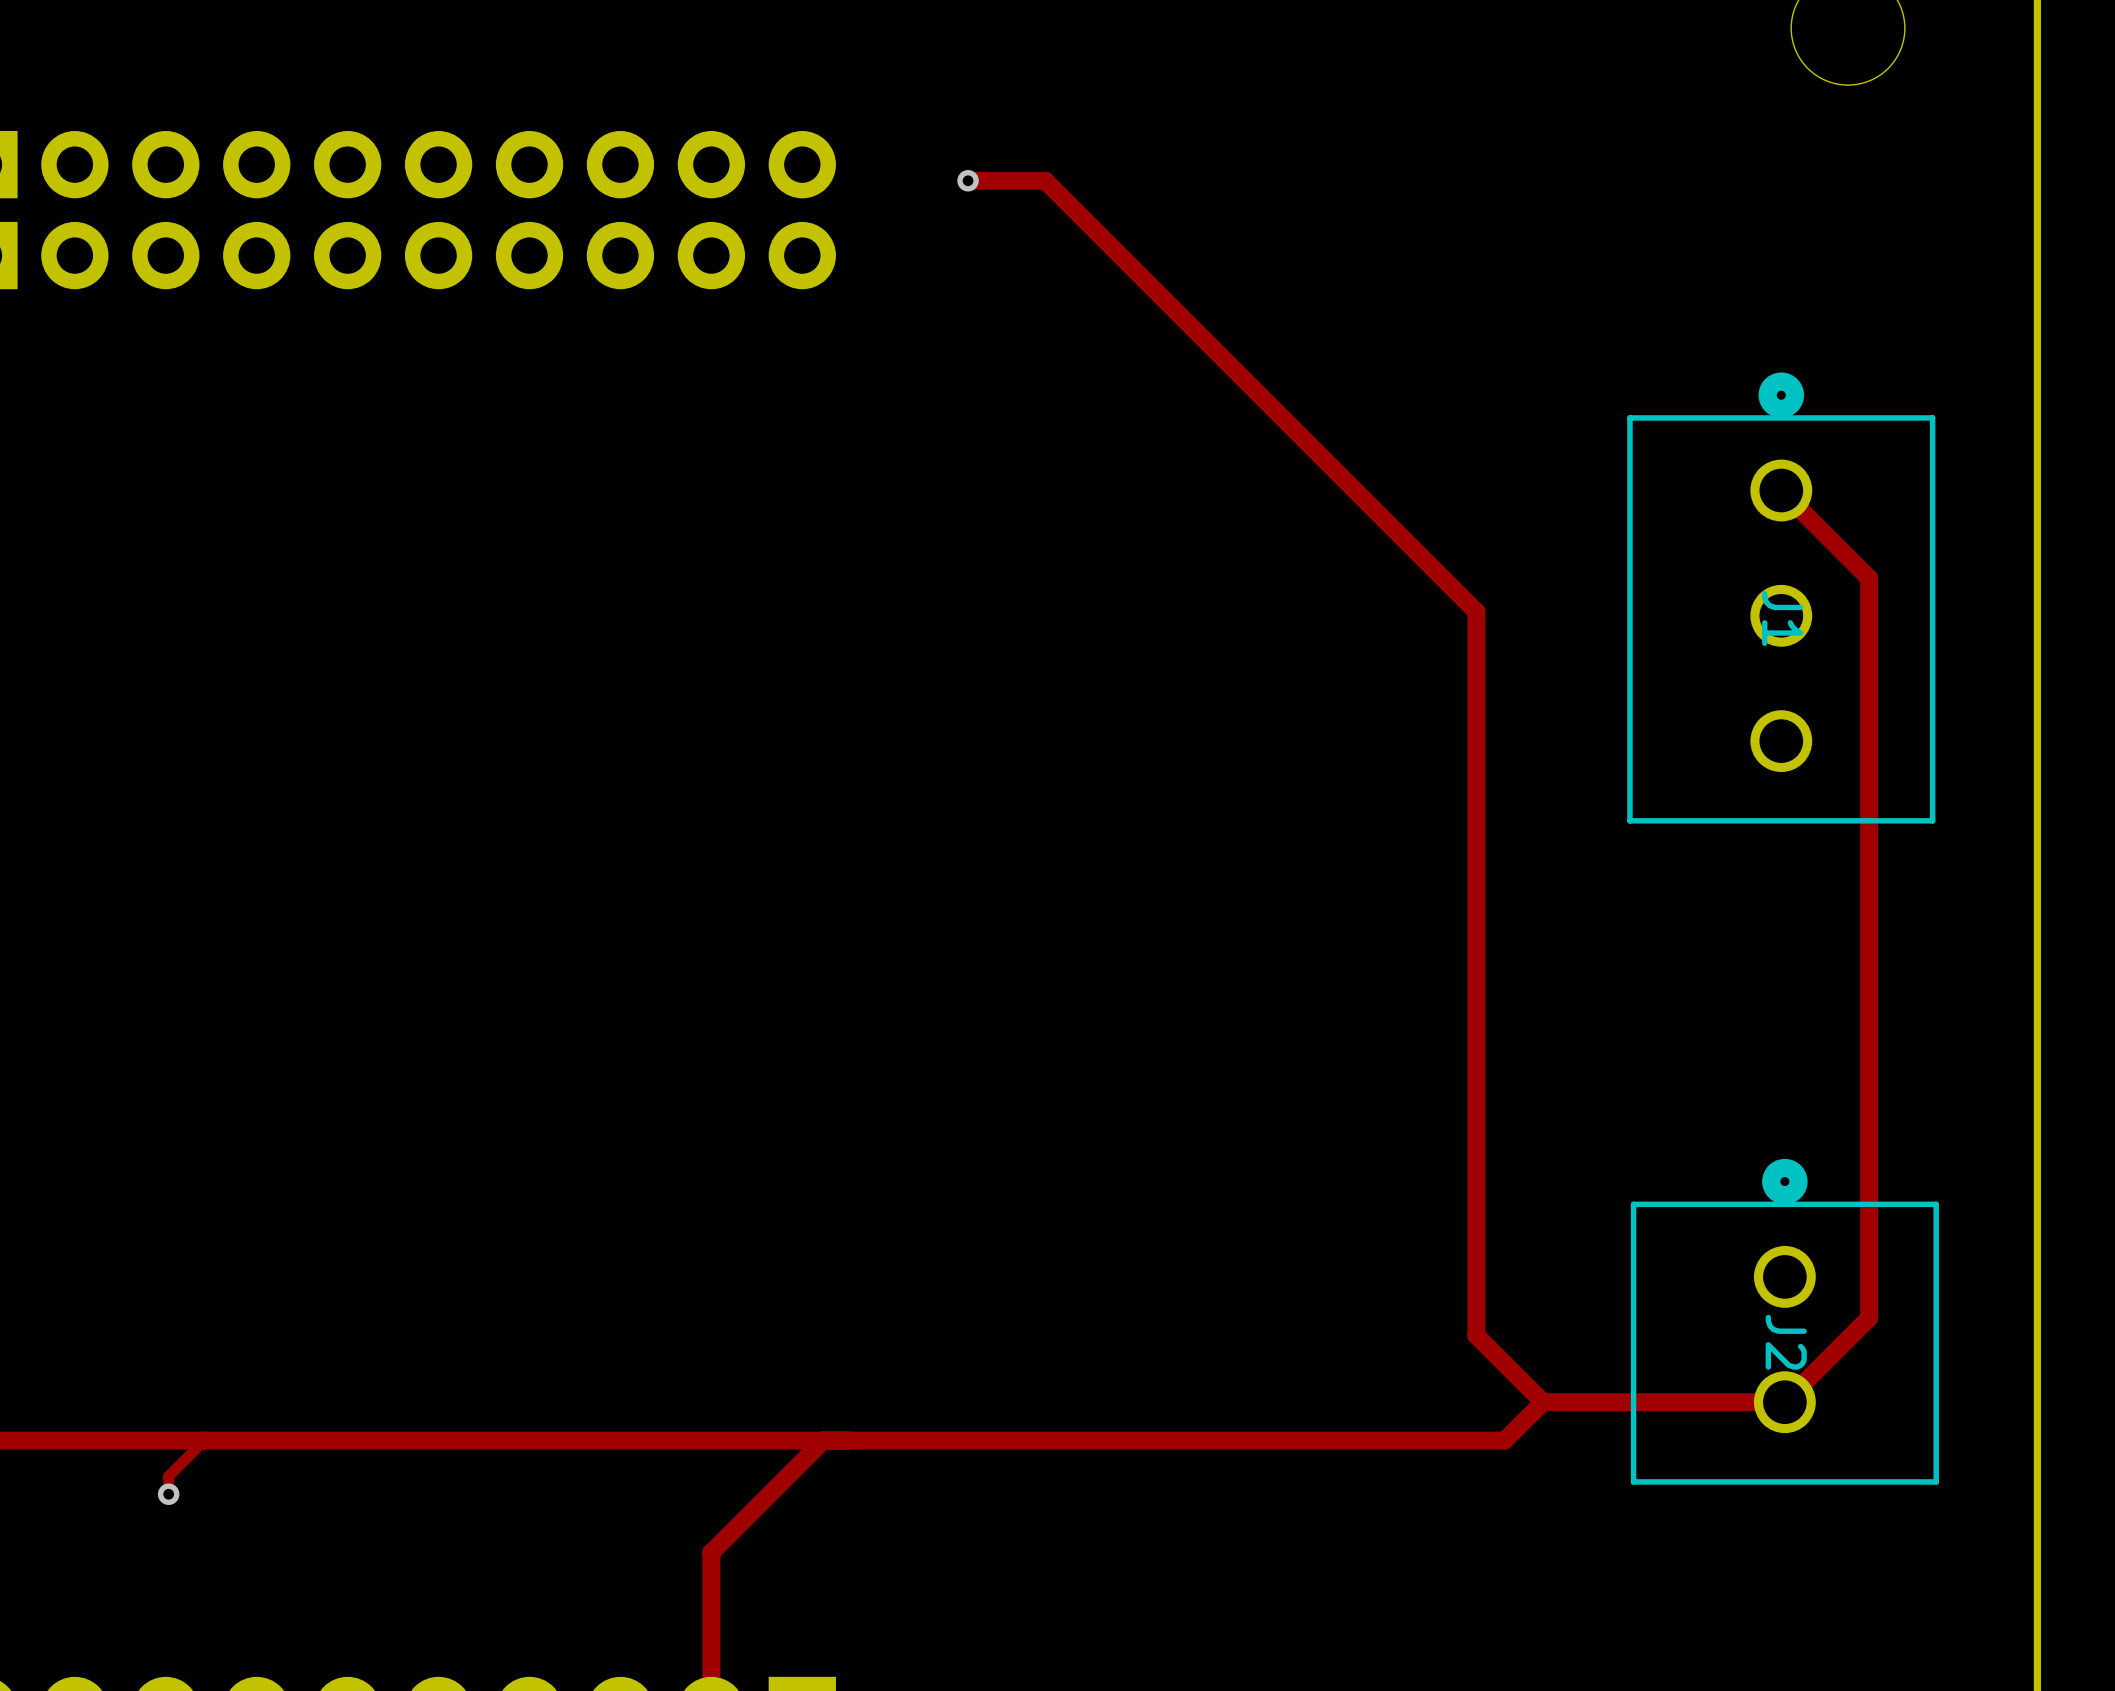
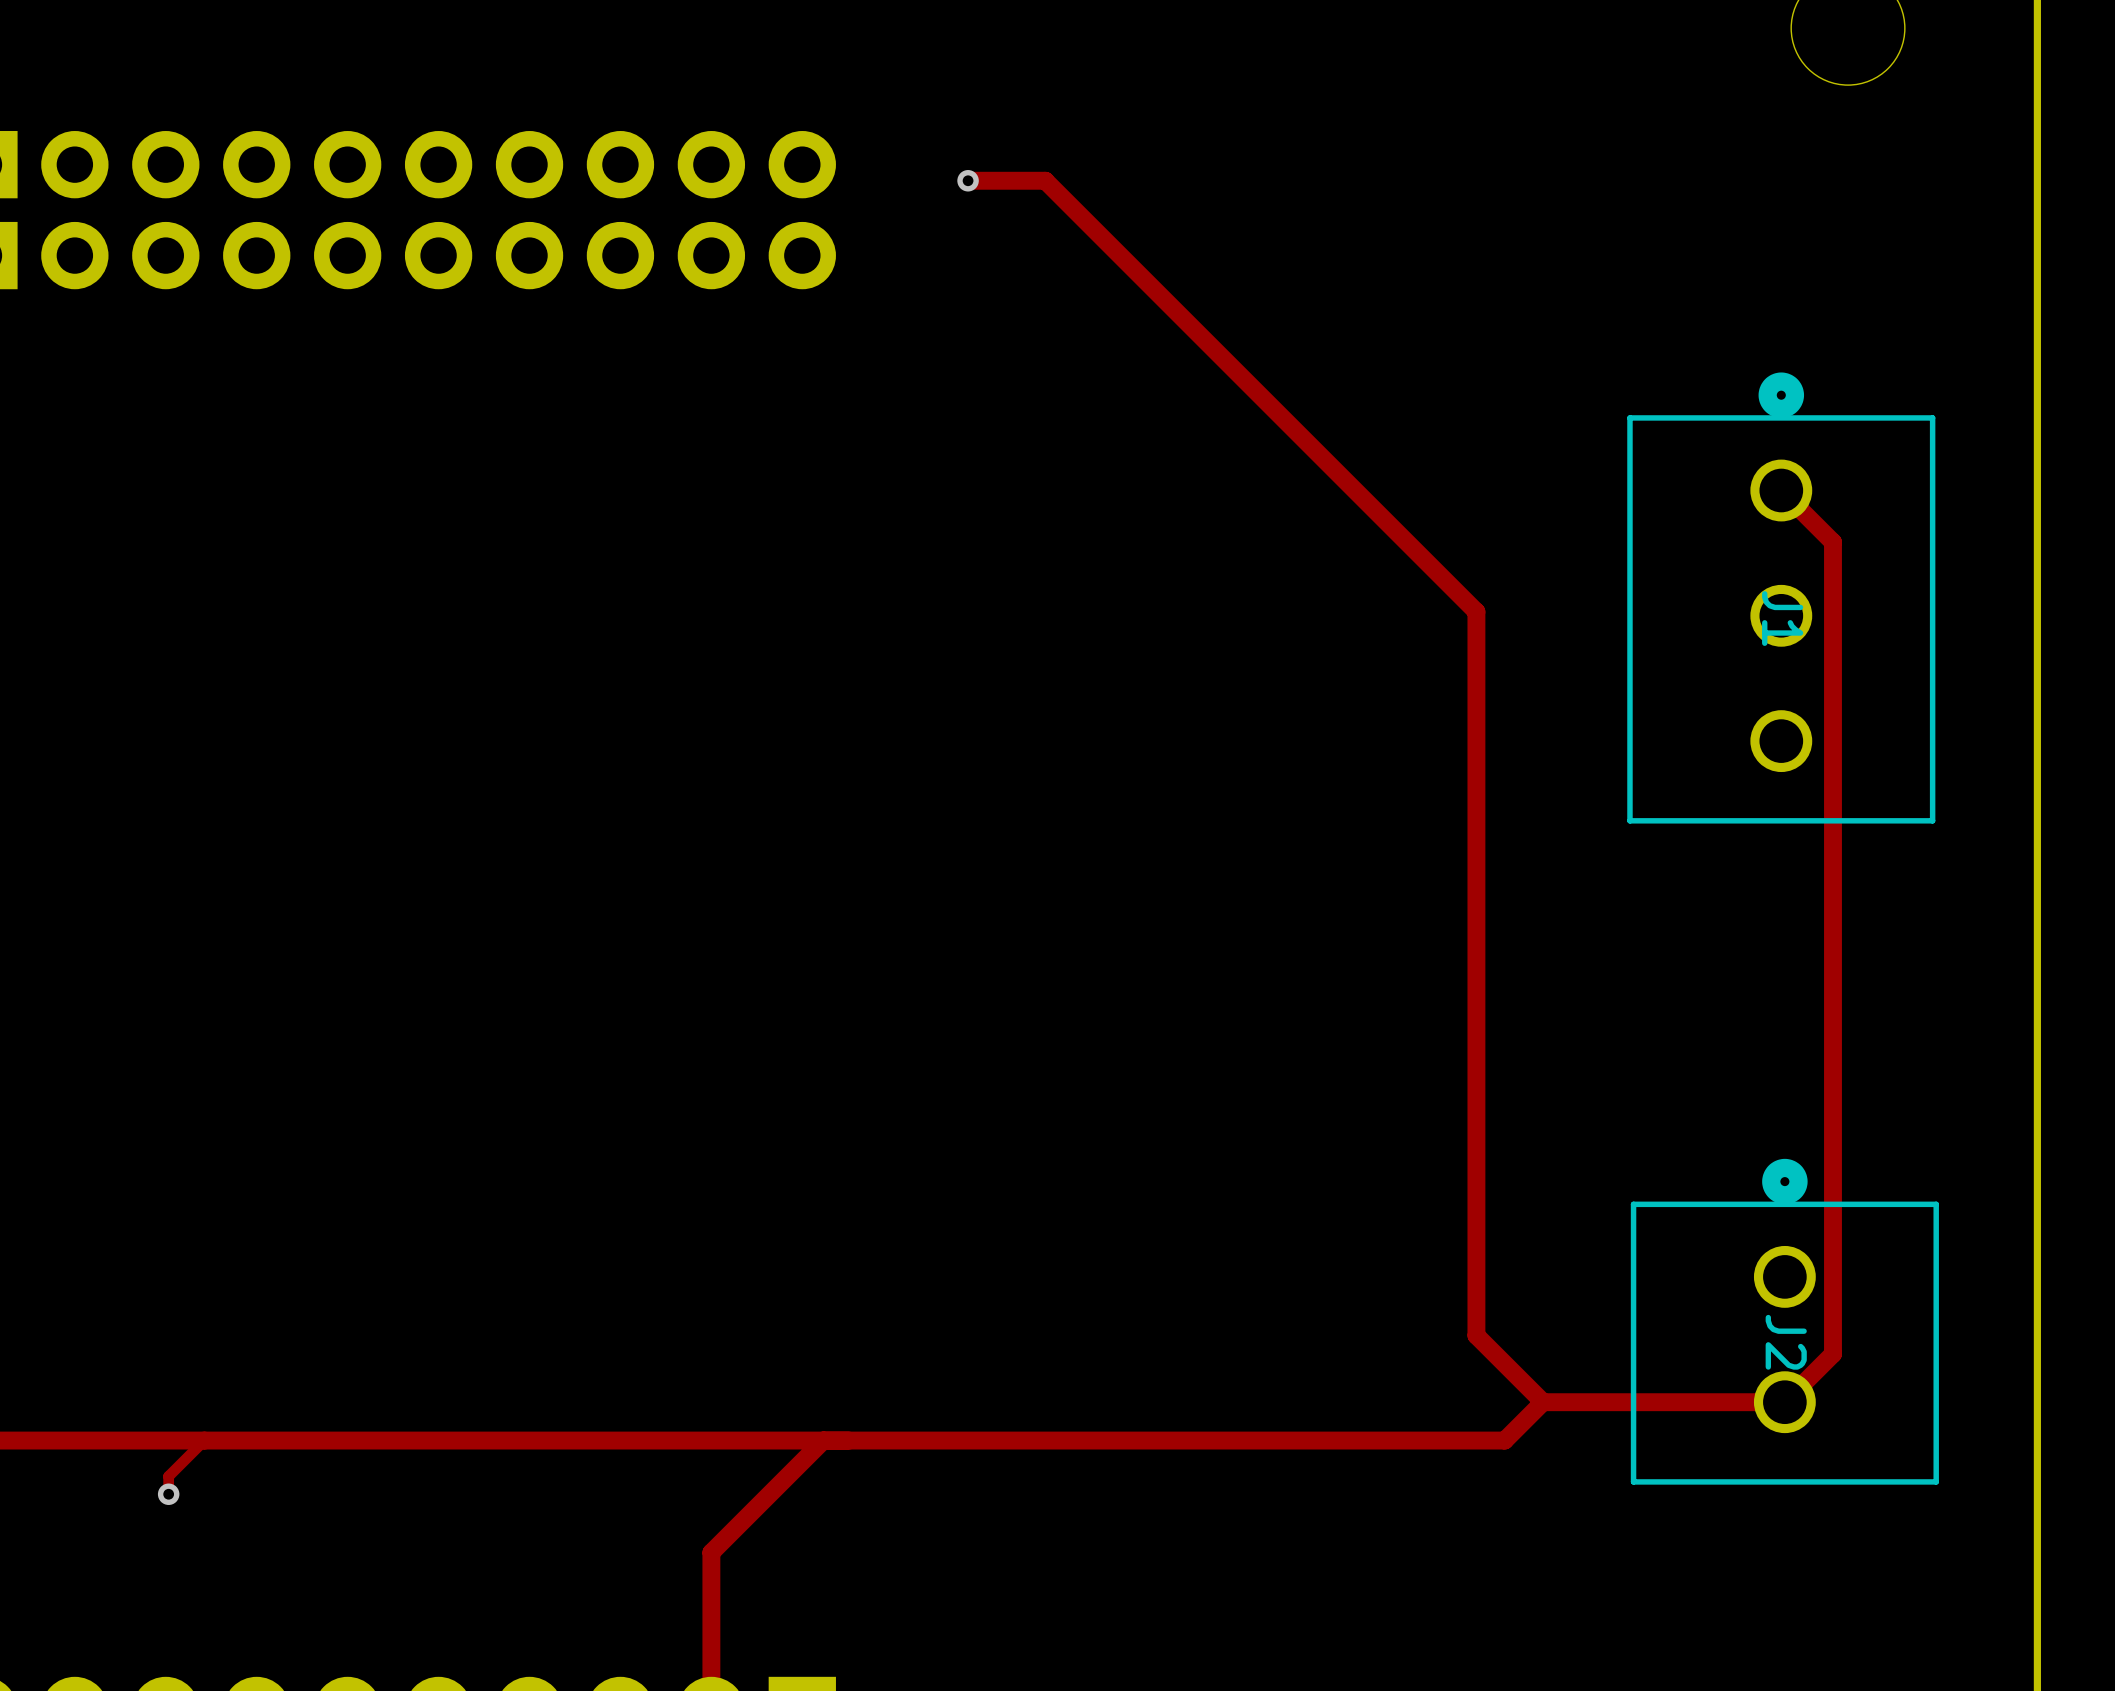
track: (1832, 542) (1869, 578) (1869, 1317) (1832, 1354) -> (1832, 542) (1832, 1354)

